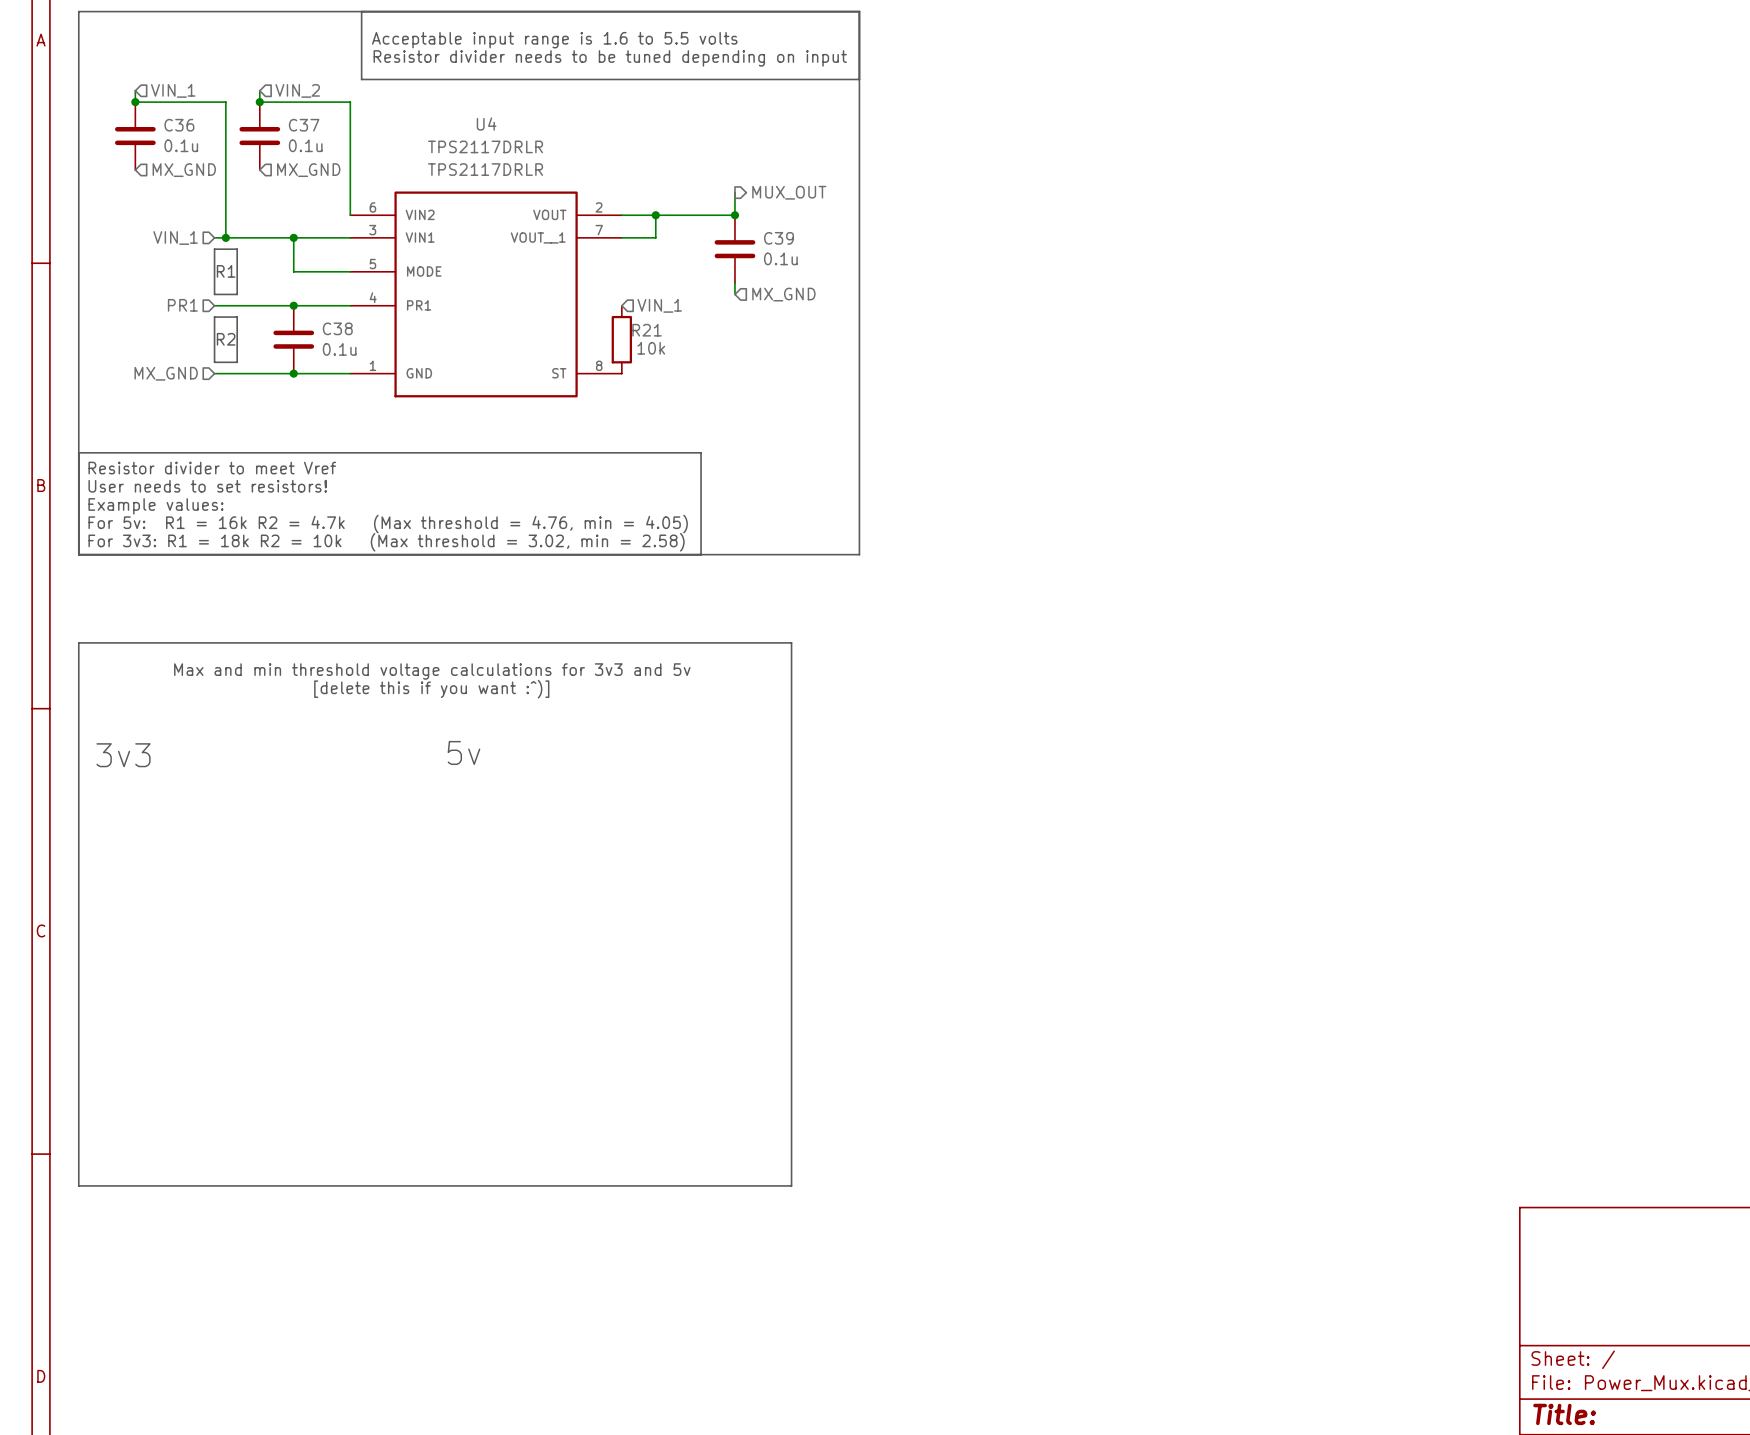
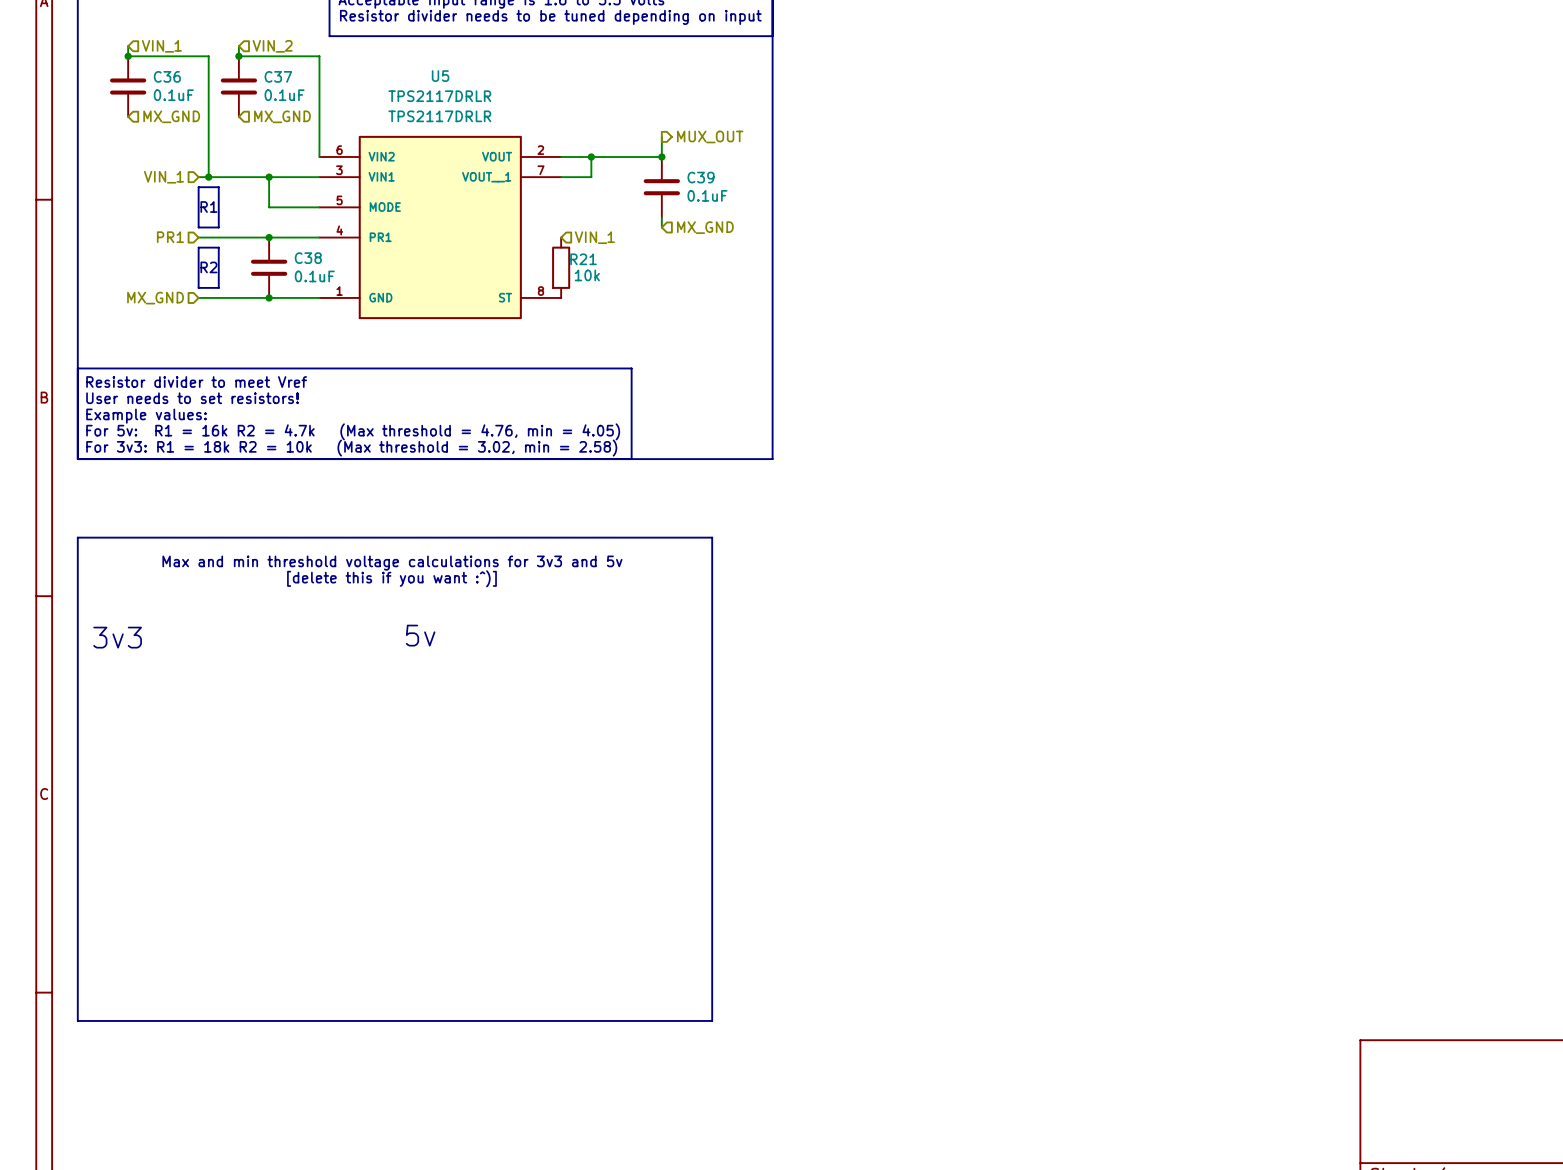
U4 name: U4 (486, 124) -> U5 (440, 76)
C36 value: 0.1u (181, 145) -> 0.1uF (173, 95)
C37 value: 0.1u (305, 145) -> 0.1uF (284, 95)
C39 value: 0.1u (780, 258) -> 0.1uF (707, 195)
C38 value: 0.1u (339, 349) -> 0.1uF (314, 276)

